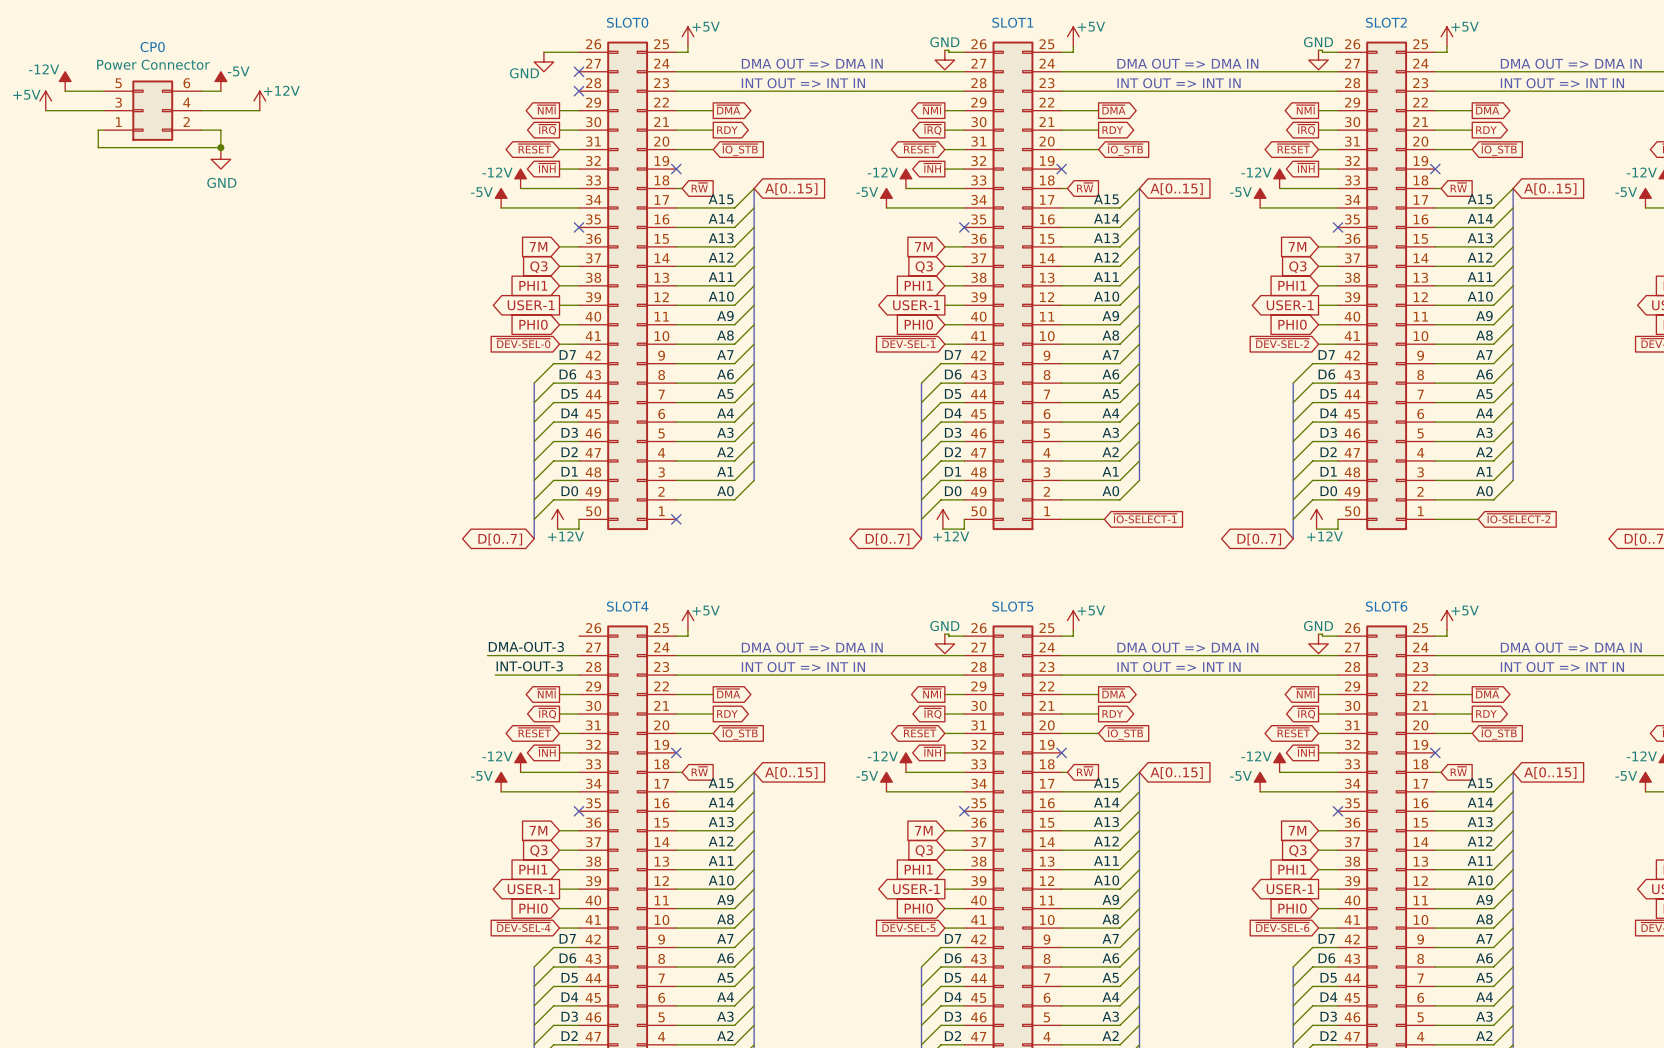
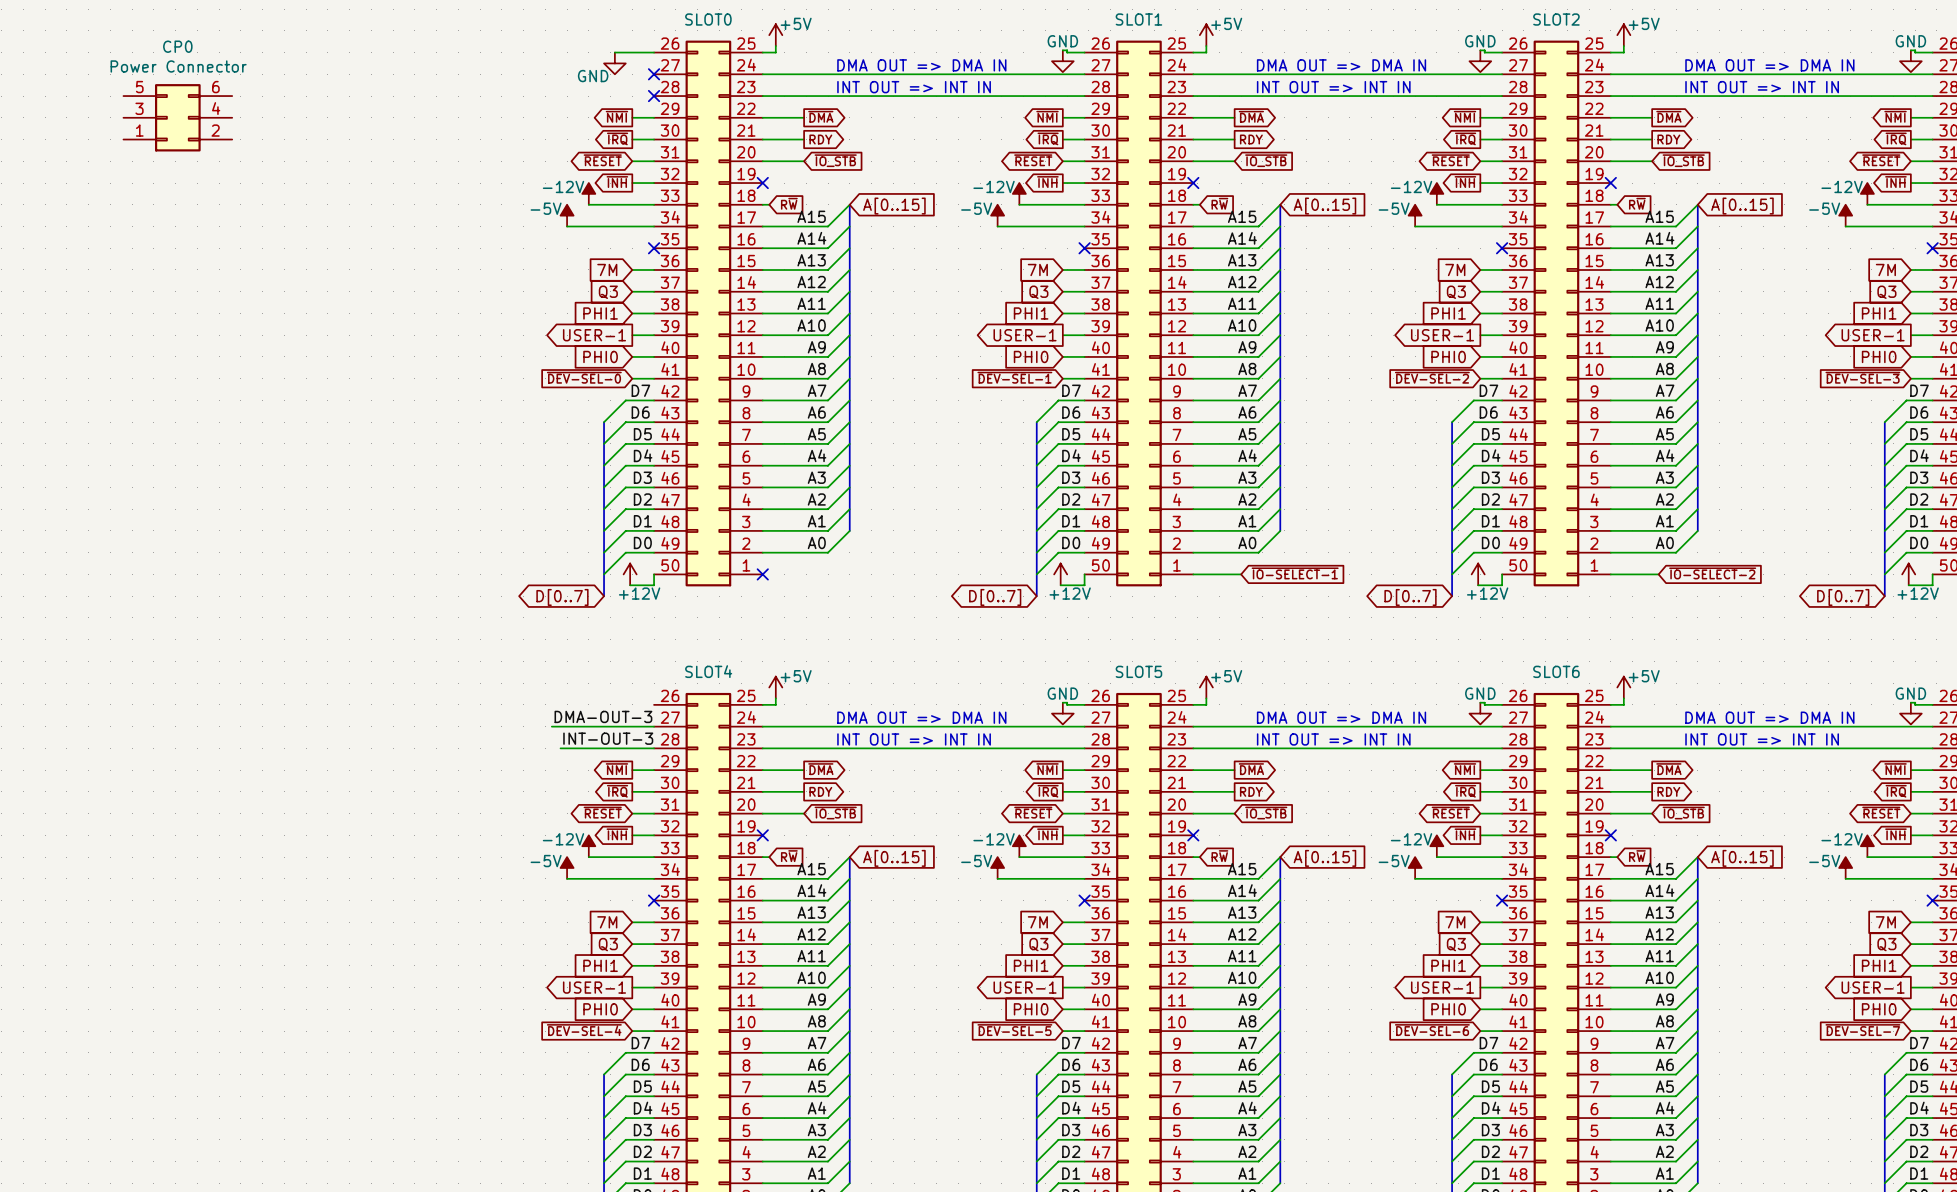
power symbol: -12V (65, 81) -> none
power symbol: -5V (220, 81) -> none
wire: (65, 91) (104, 91) -> none
wire: (201, 91) (220, 91) -> none
power symbol: +5V (45, 100) -> none
power symbol: +12V (259, 100) -> none
wire: (45, 110) (104, 110) -> none
wire: (201, 110) (259, 110) -> none
wire: (104, 130) (98, 130) (98, 147) (220, 147) -> none
wire: (201, 130) (220, 130) (220, 149) -> none
junction: (220, 147) -> none
power symbol: GND (220, 159) -> none

